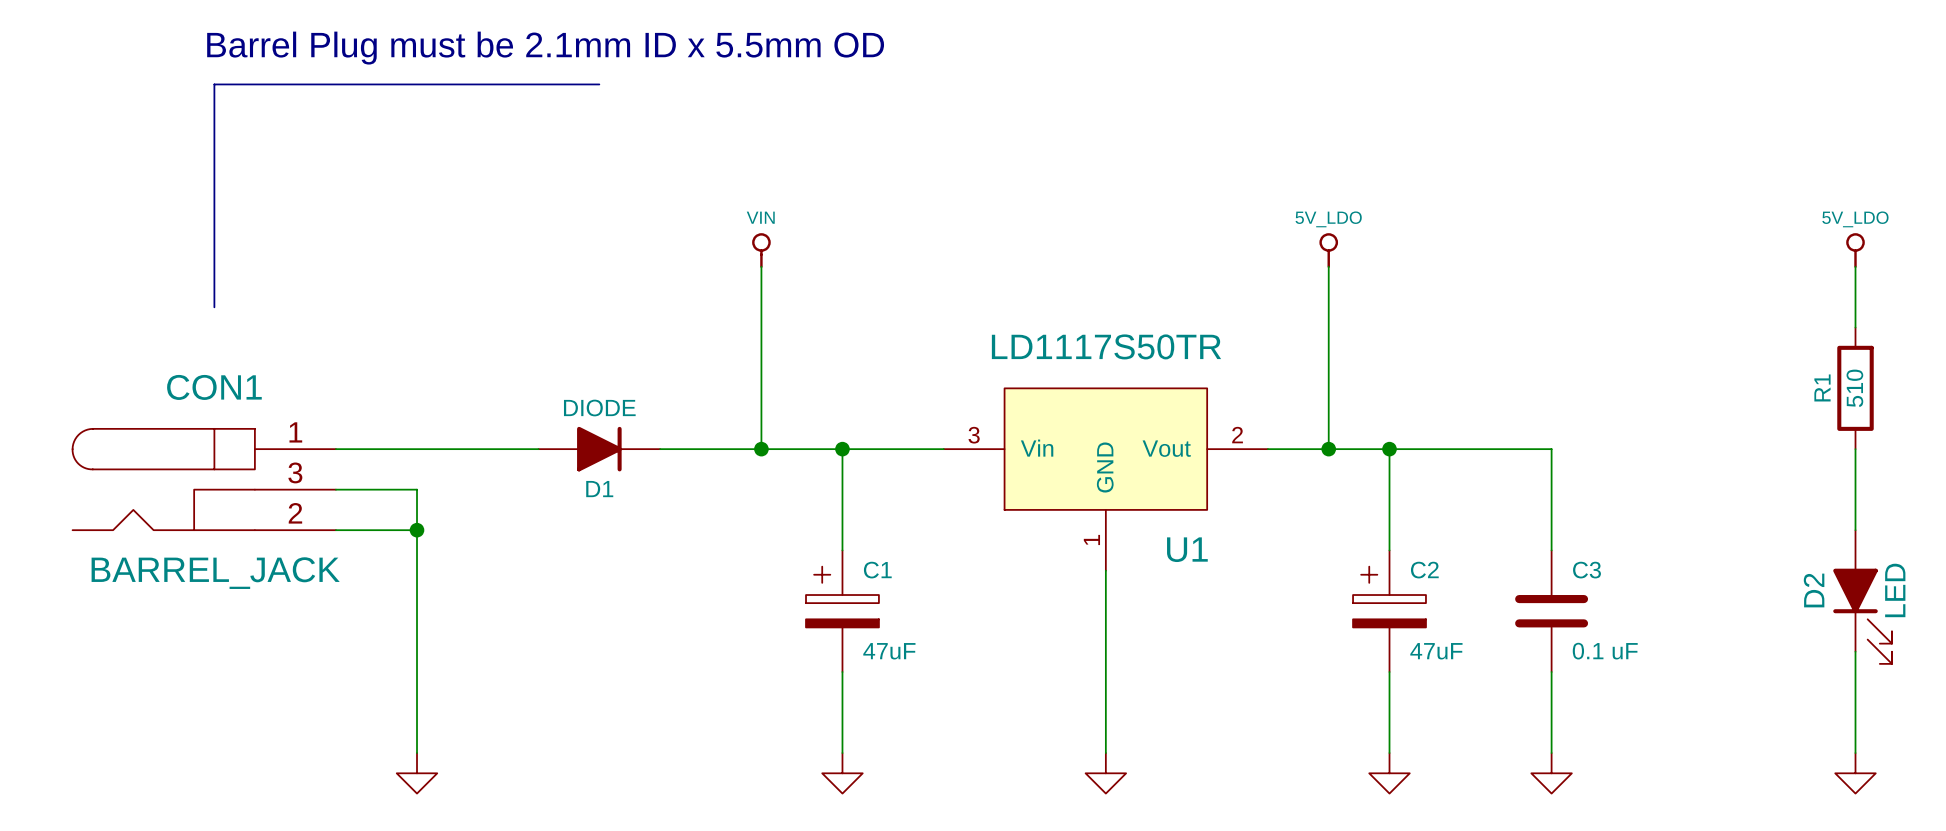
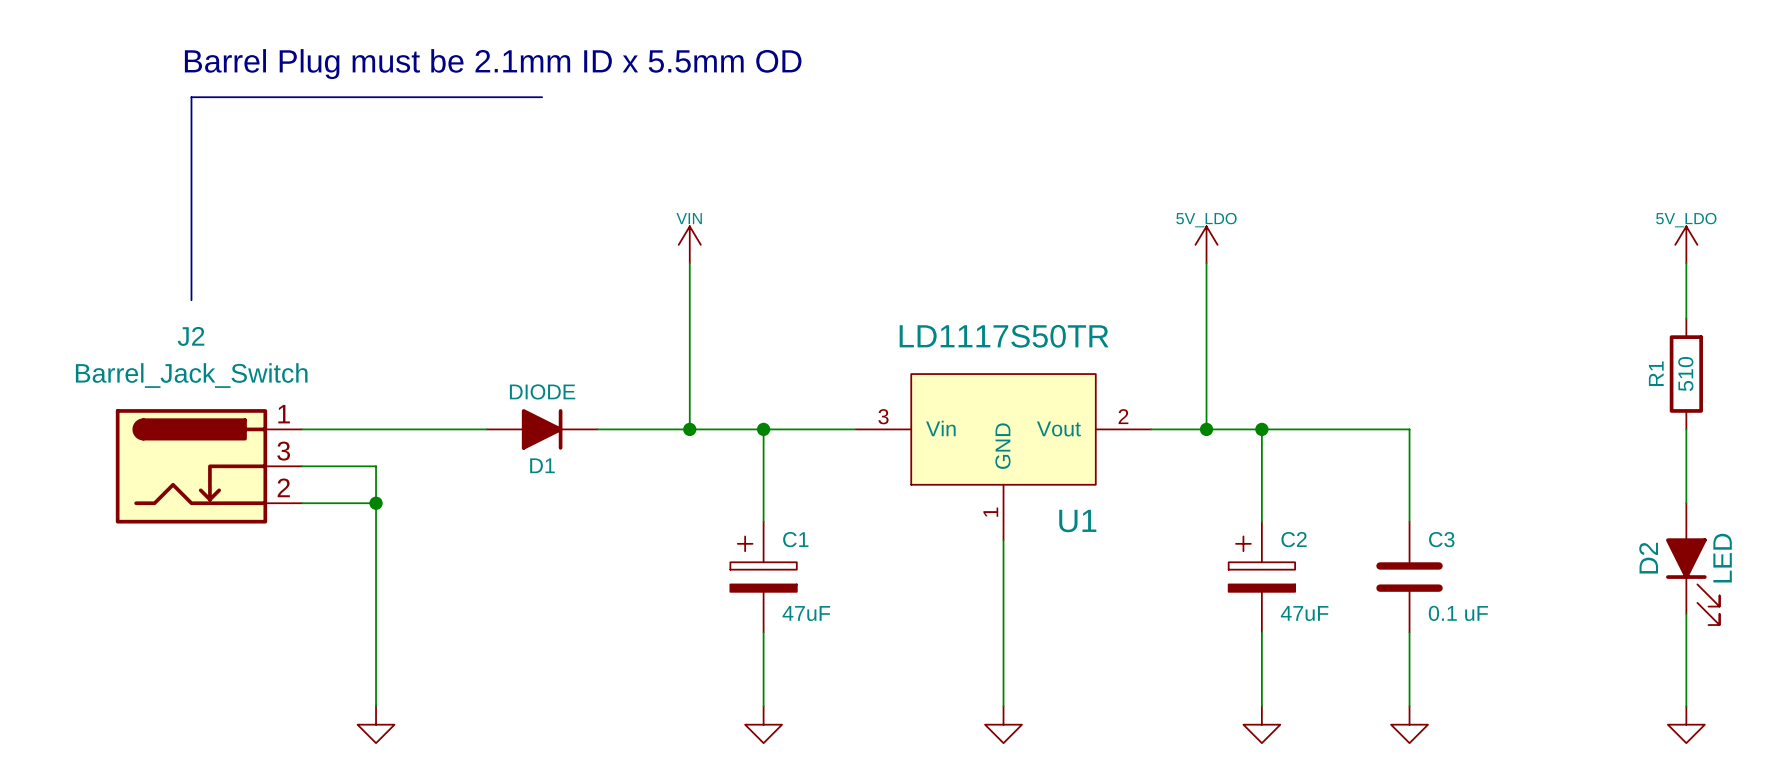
power symbol shape: [752, 233, 771, 269] -> [678, 226, 701, 264]
power symbol shape: [1319, 233, 1339, 269] -> [1195, 226, 1218, 264]
power symbol shape: [1846, 233, 1865, 269] -> [1675, 226, 1698, 264]
CON1: BARREL_JACK (204, 479) -> none
J2: none -> Barrel_Jack_Switch (209, 466)

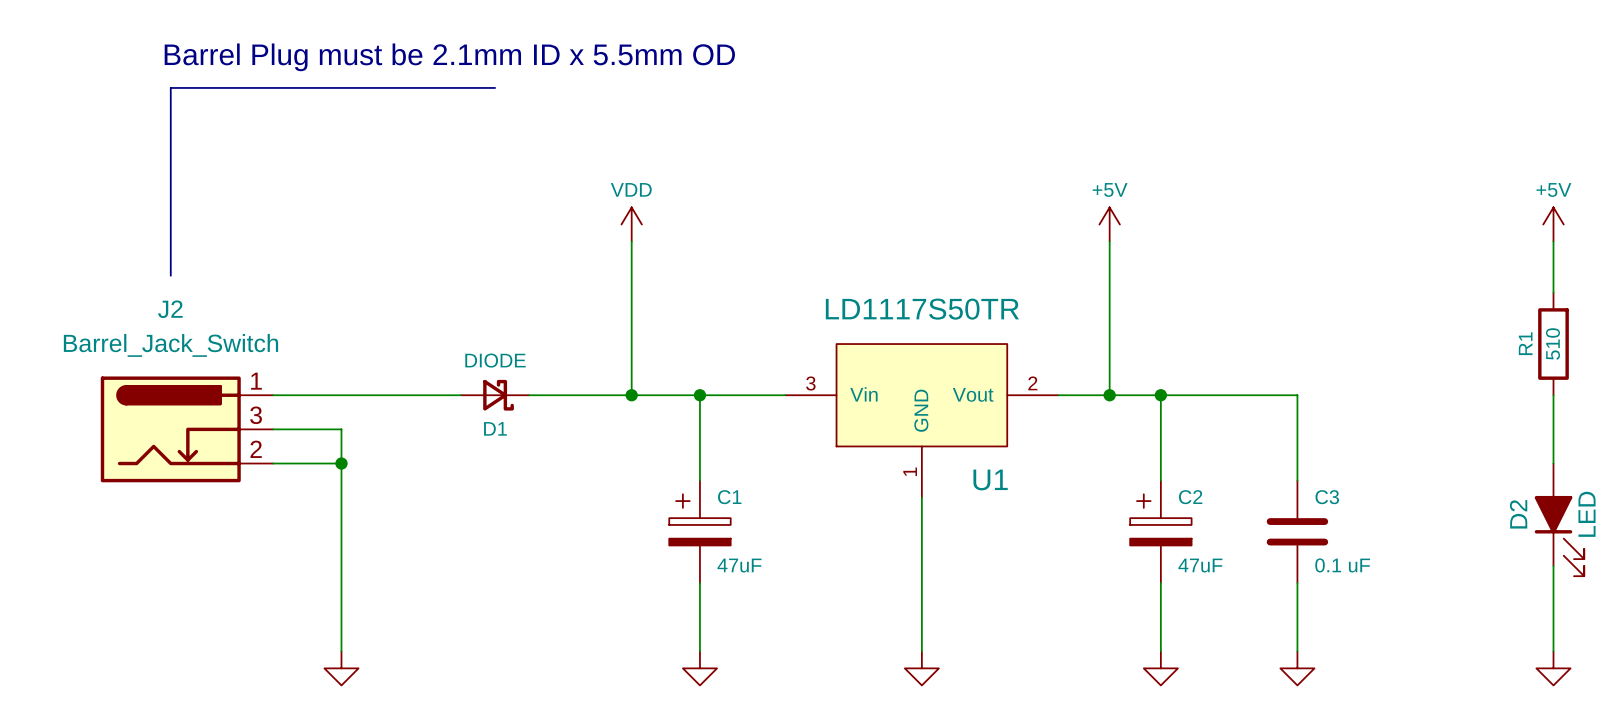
power symbol: VIN (689, 244) -> VDD (631, 224)
power symbol: 5V_LDO (1206, 244) -> +5V (1109, 224)
power symbol: 5V_LDO (1686, 244) -> +5V (1553, 224)
D1 symbol: [486, 409, 598, 450] -> [460, 379, 530, 411]

